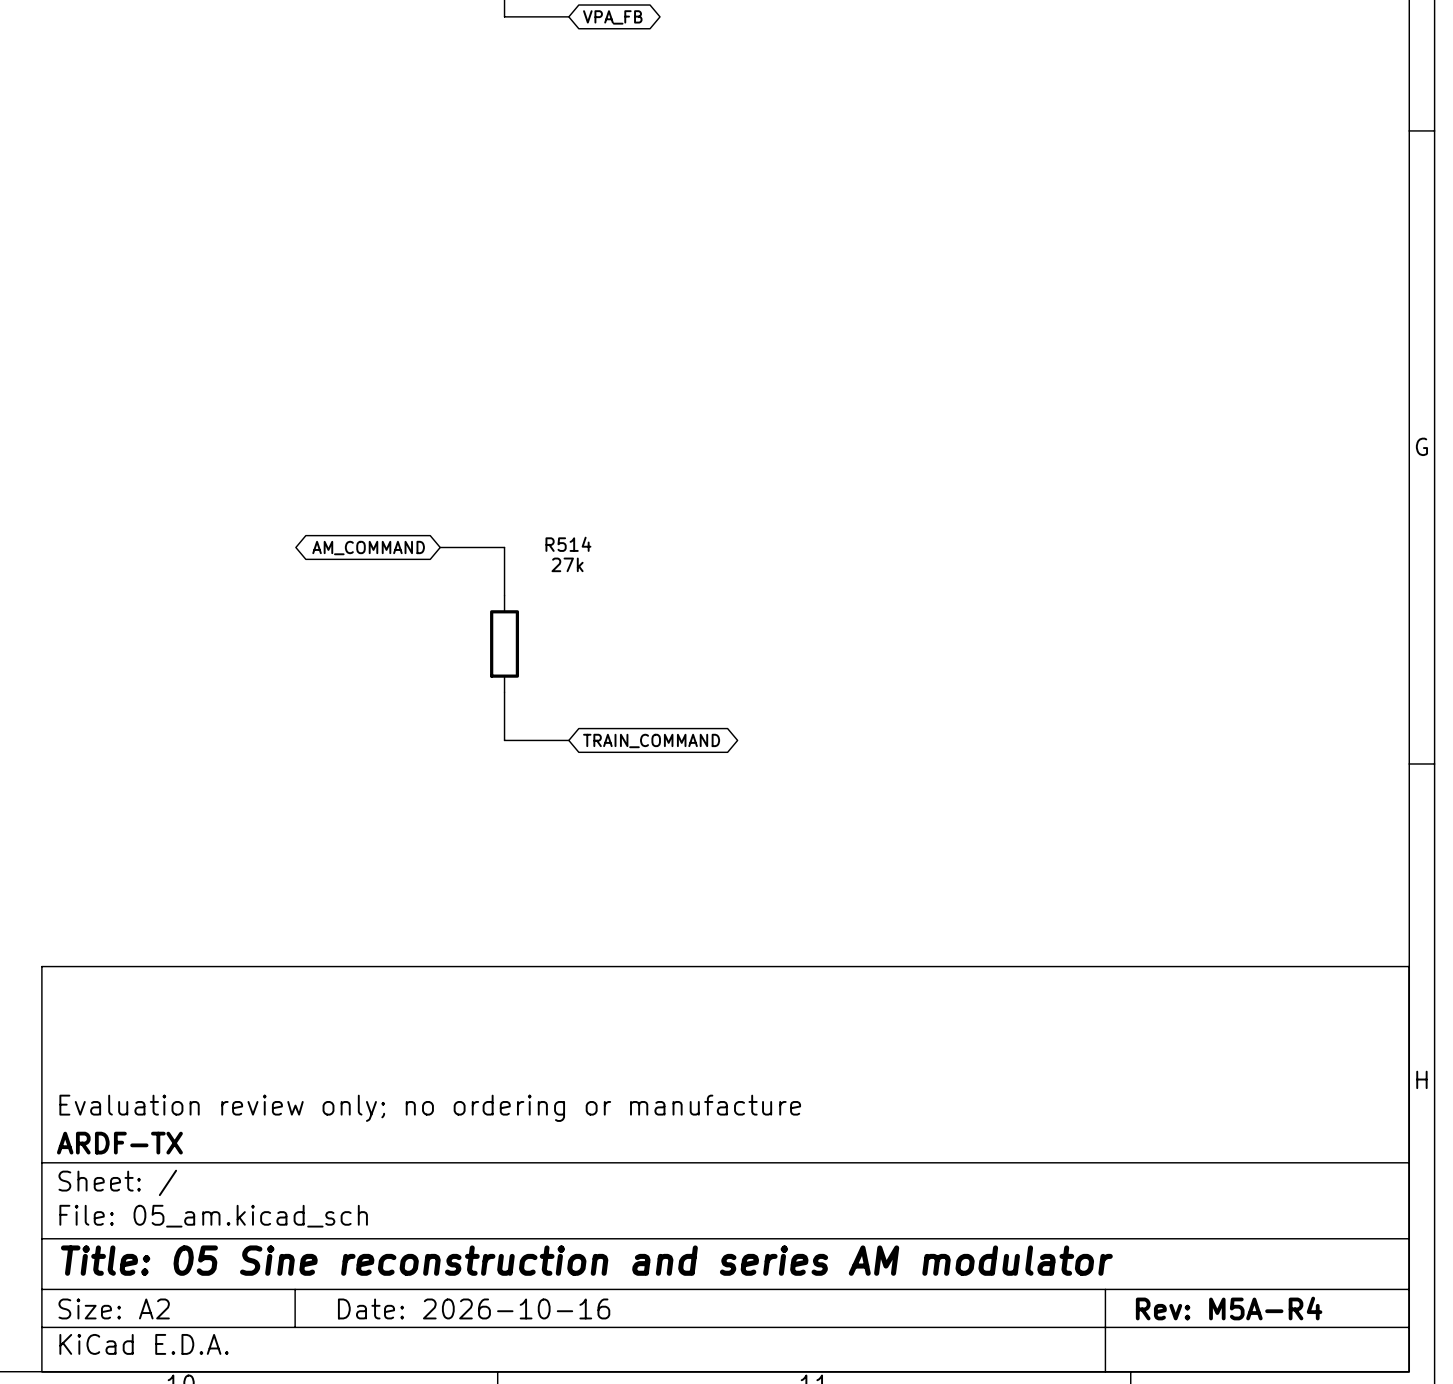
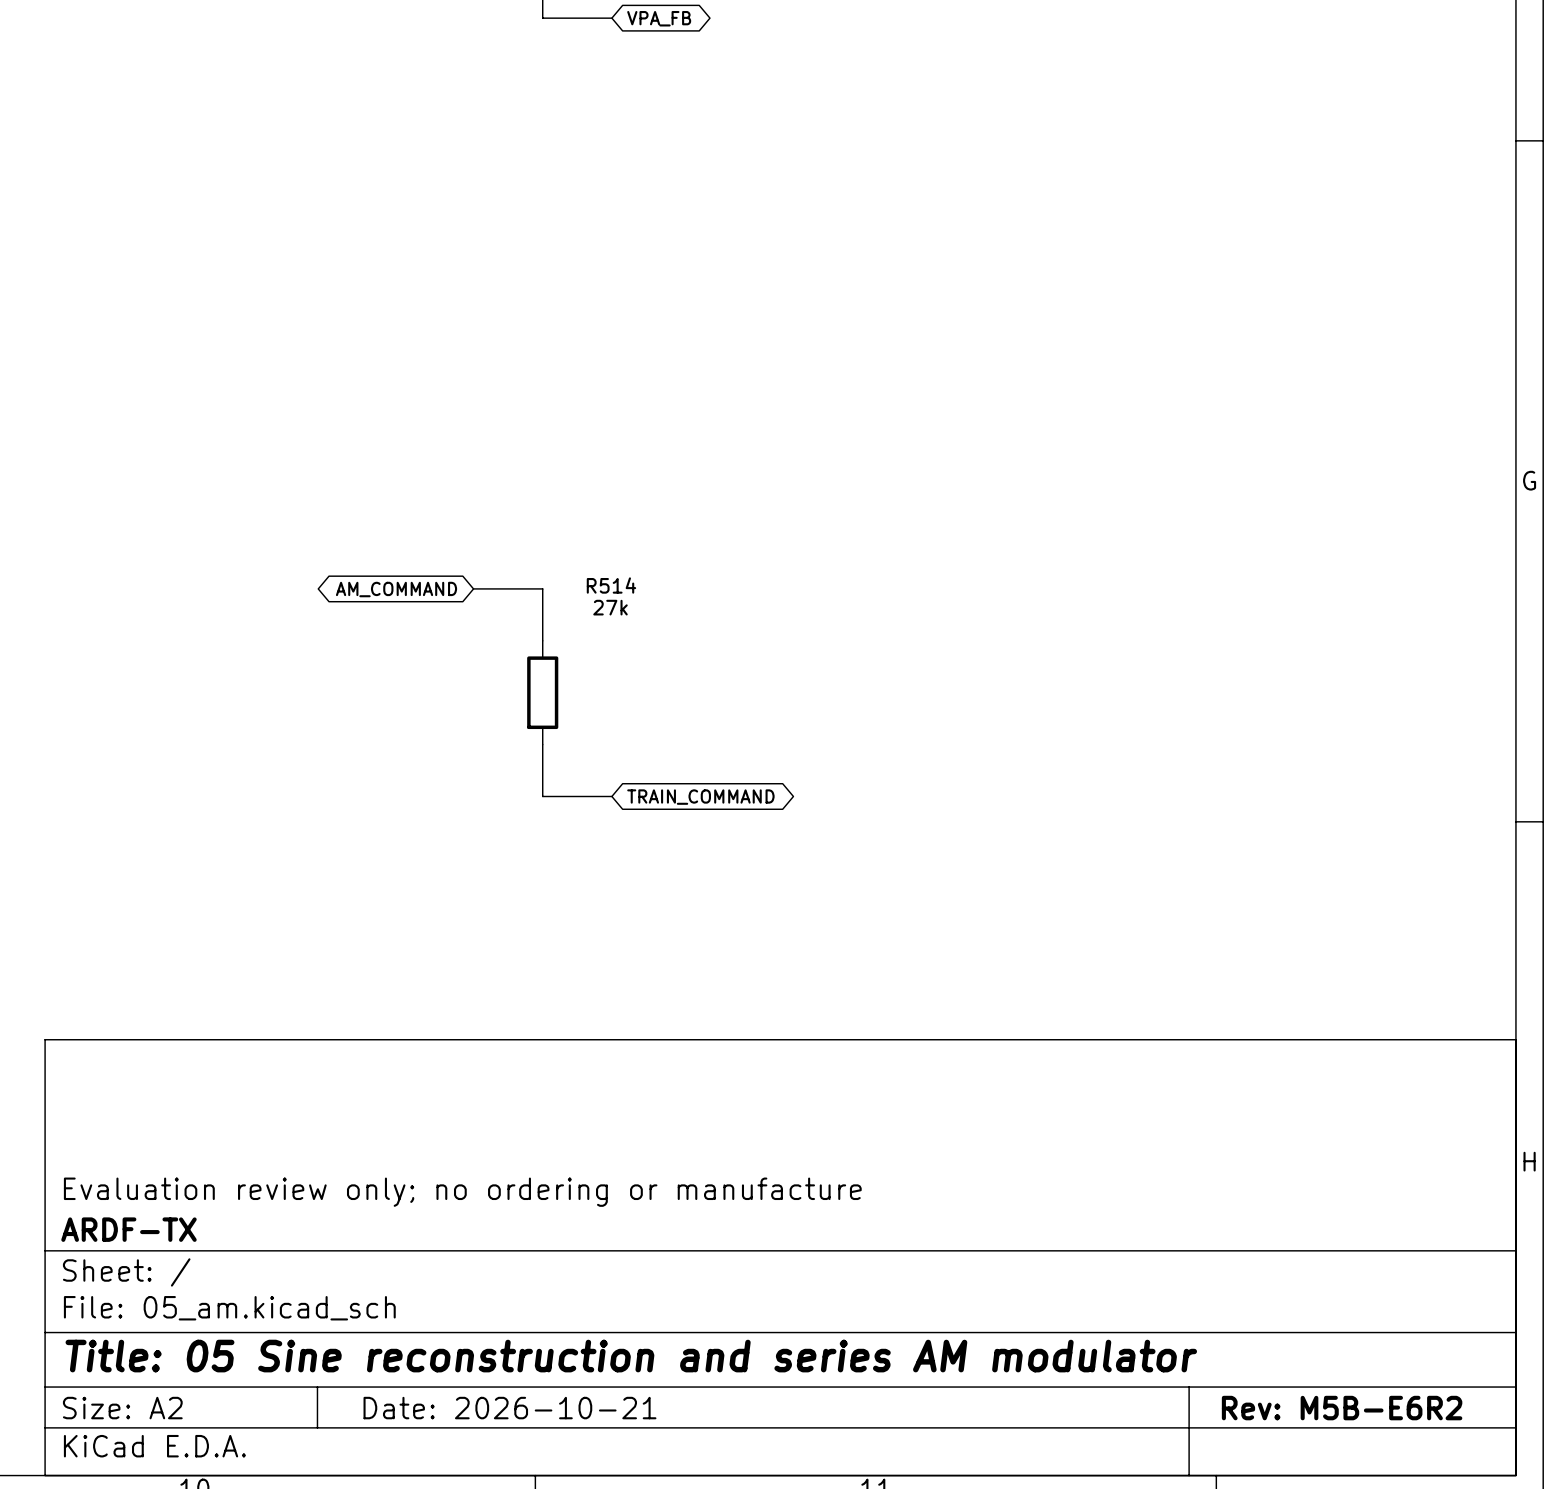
title block: Date: 2026-10-16 (474, 1308) -> Date: 2026-10-21 (509, 1408)
title block: Rev: M5A-R4 (1229, 1308) -> Rev: M5B-E6R2 (1342, 1408)

